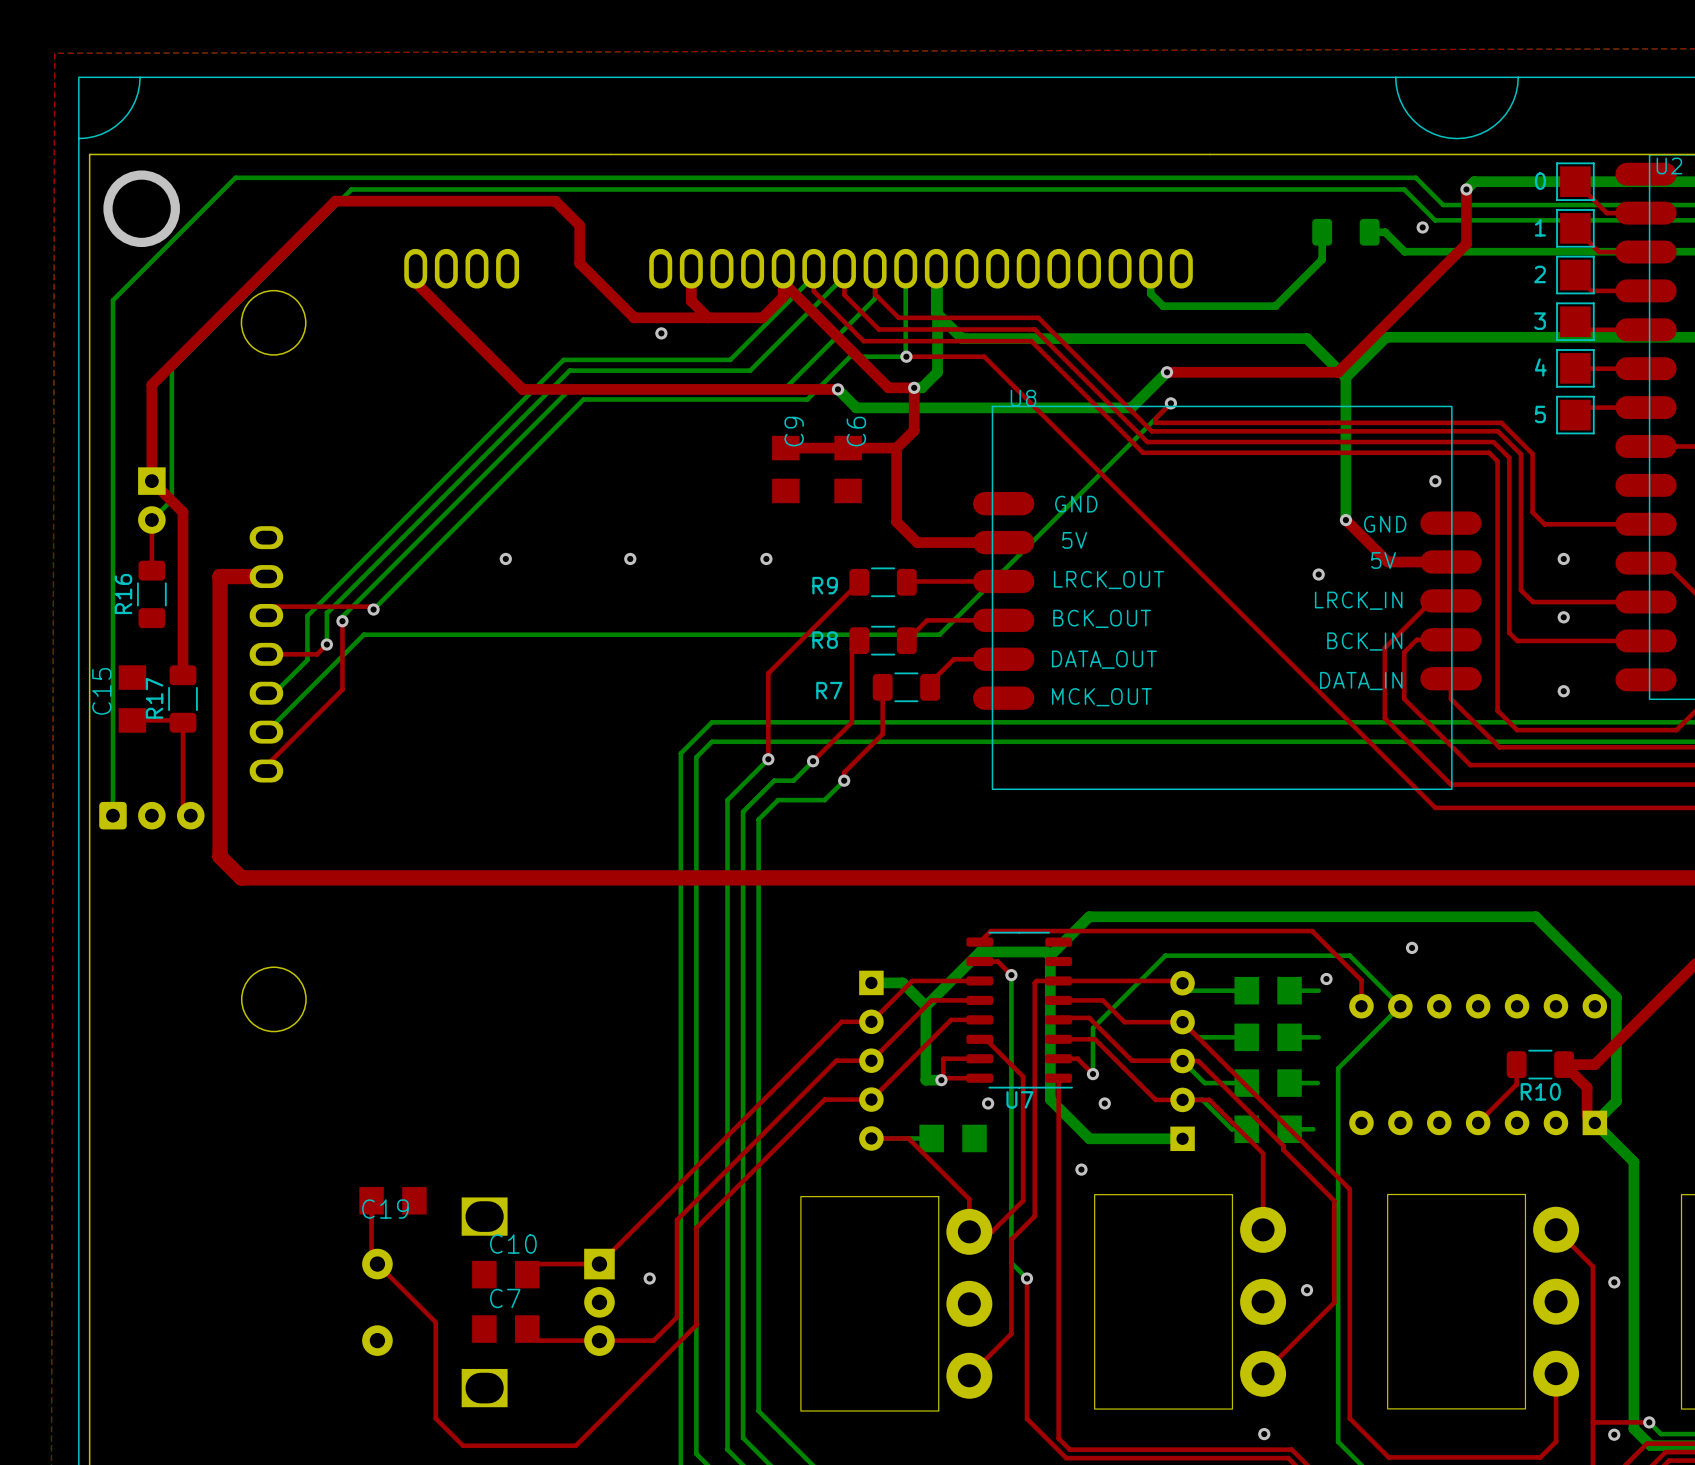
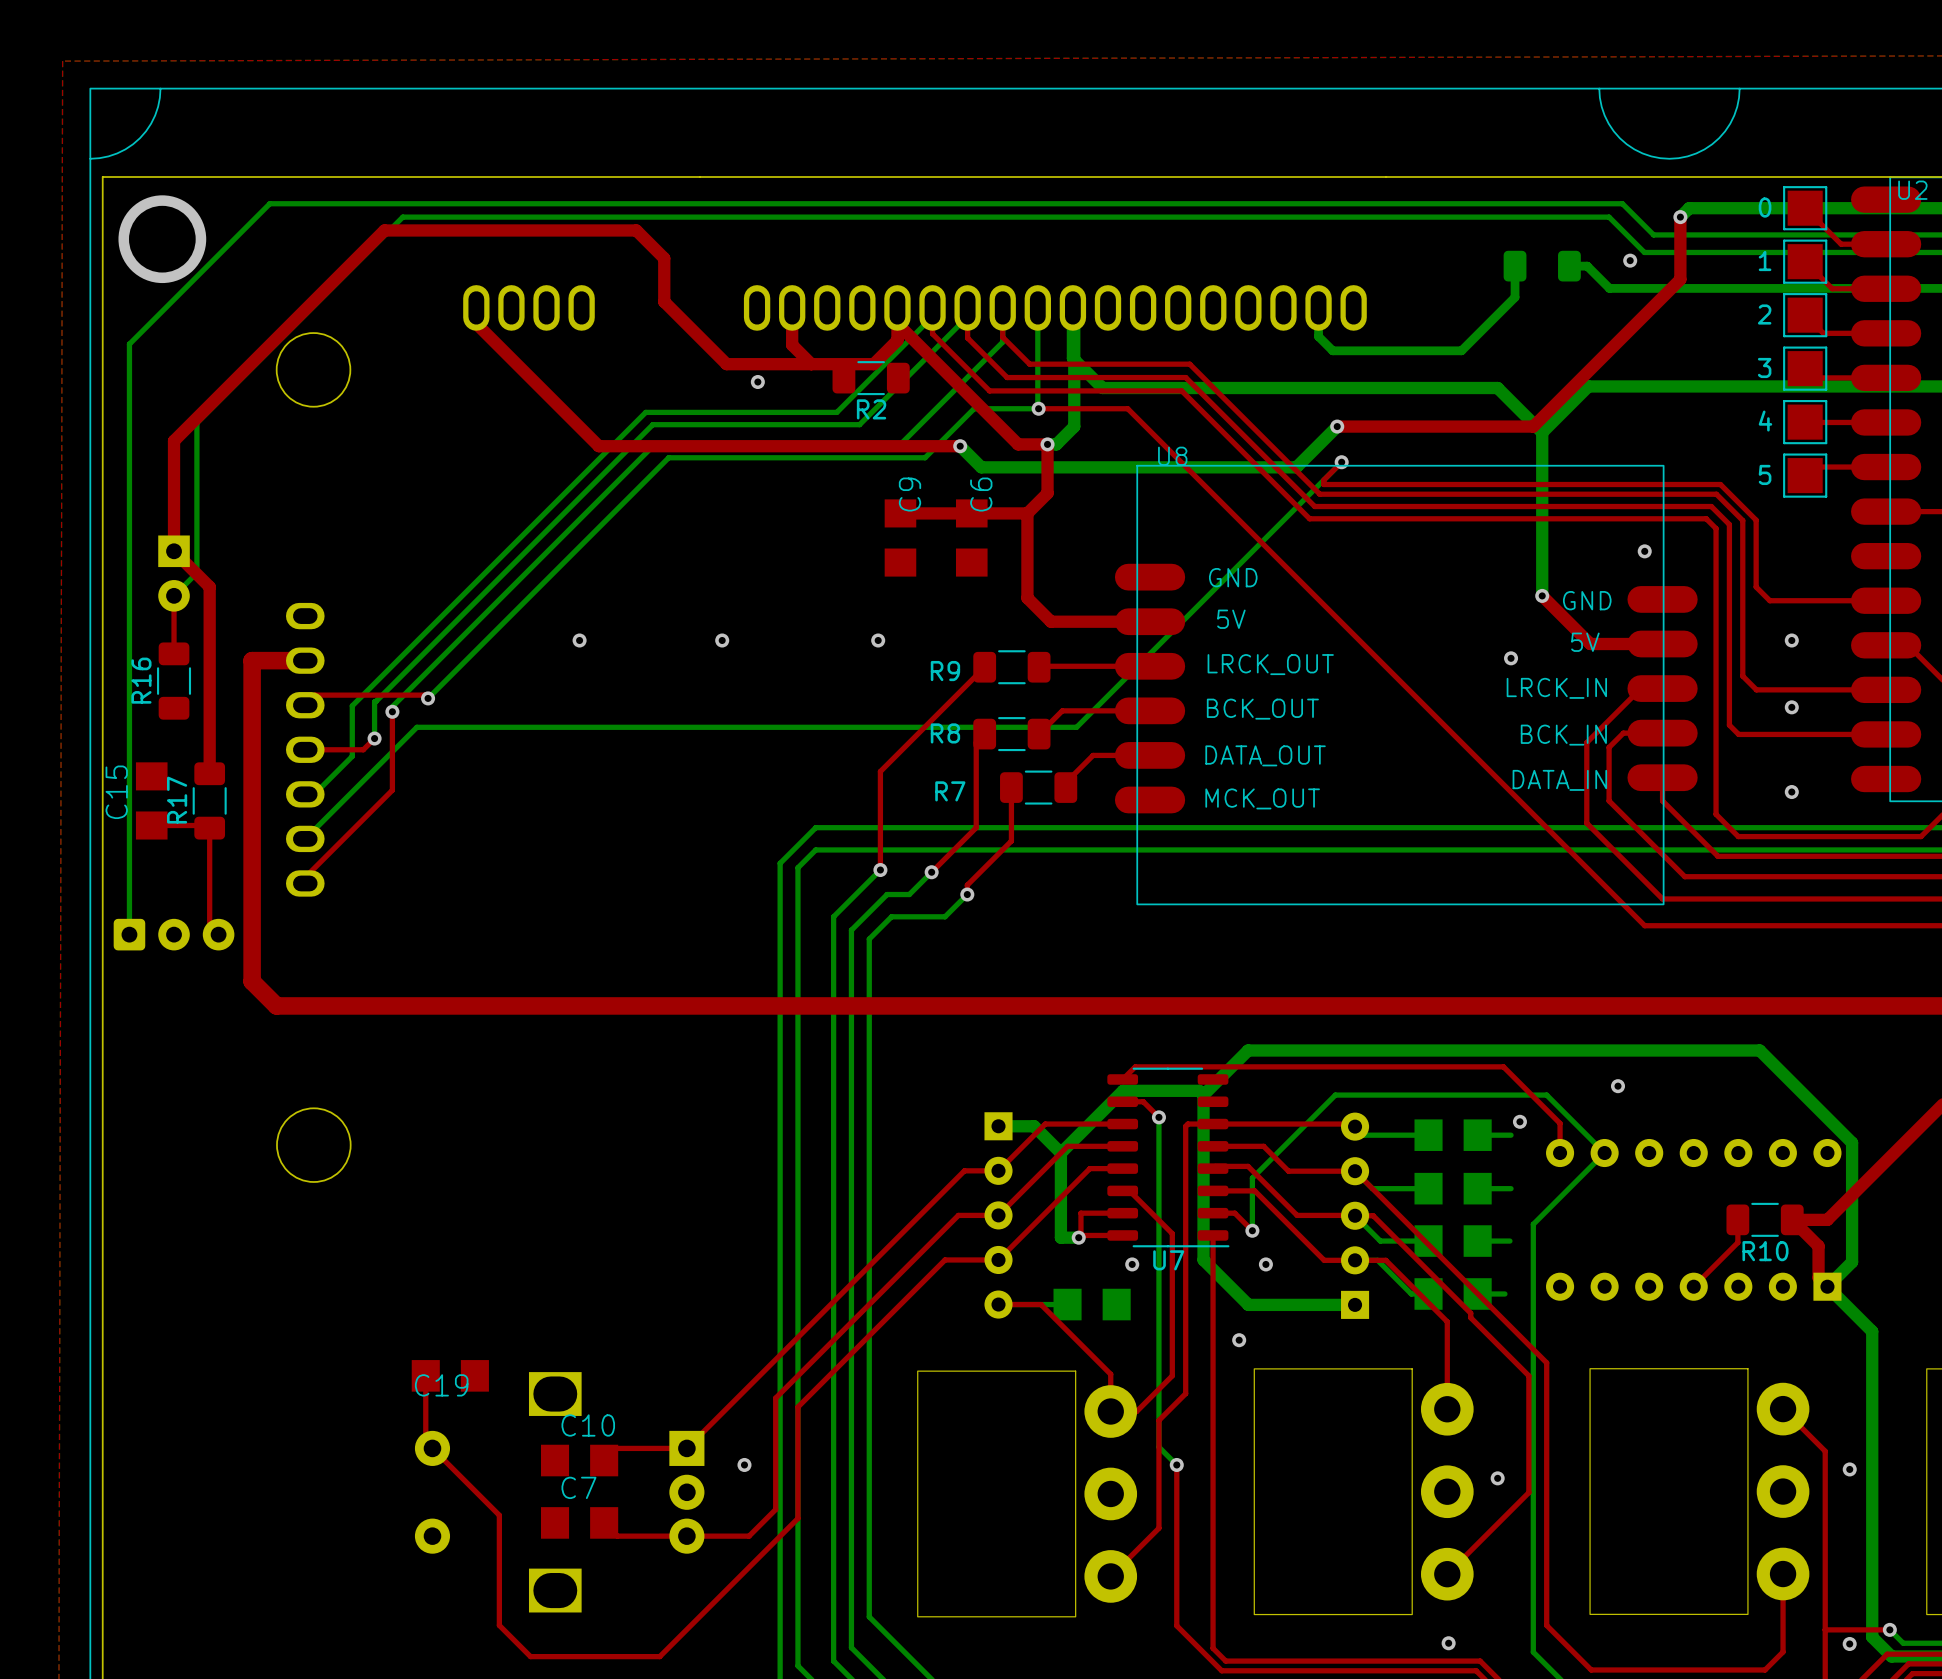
R2: none -> (871, 378)

